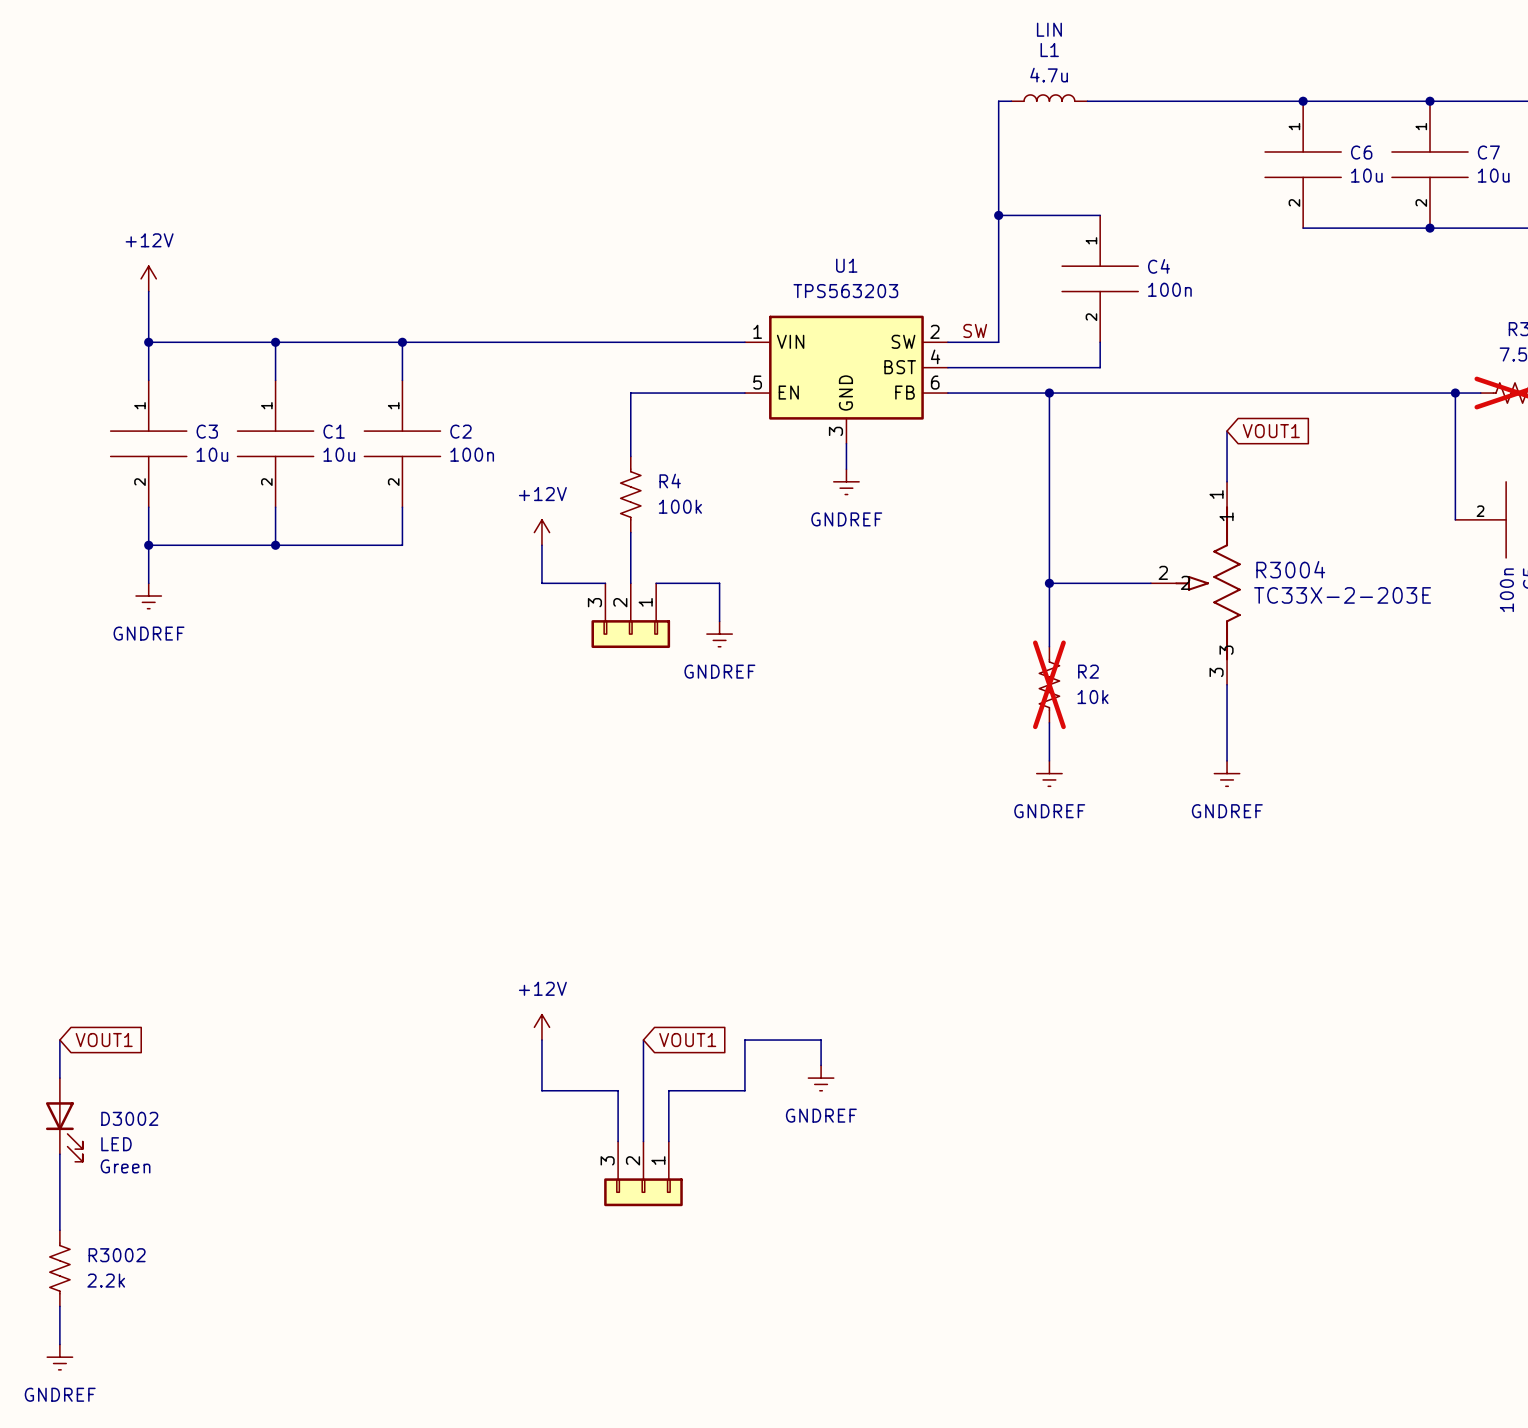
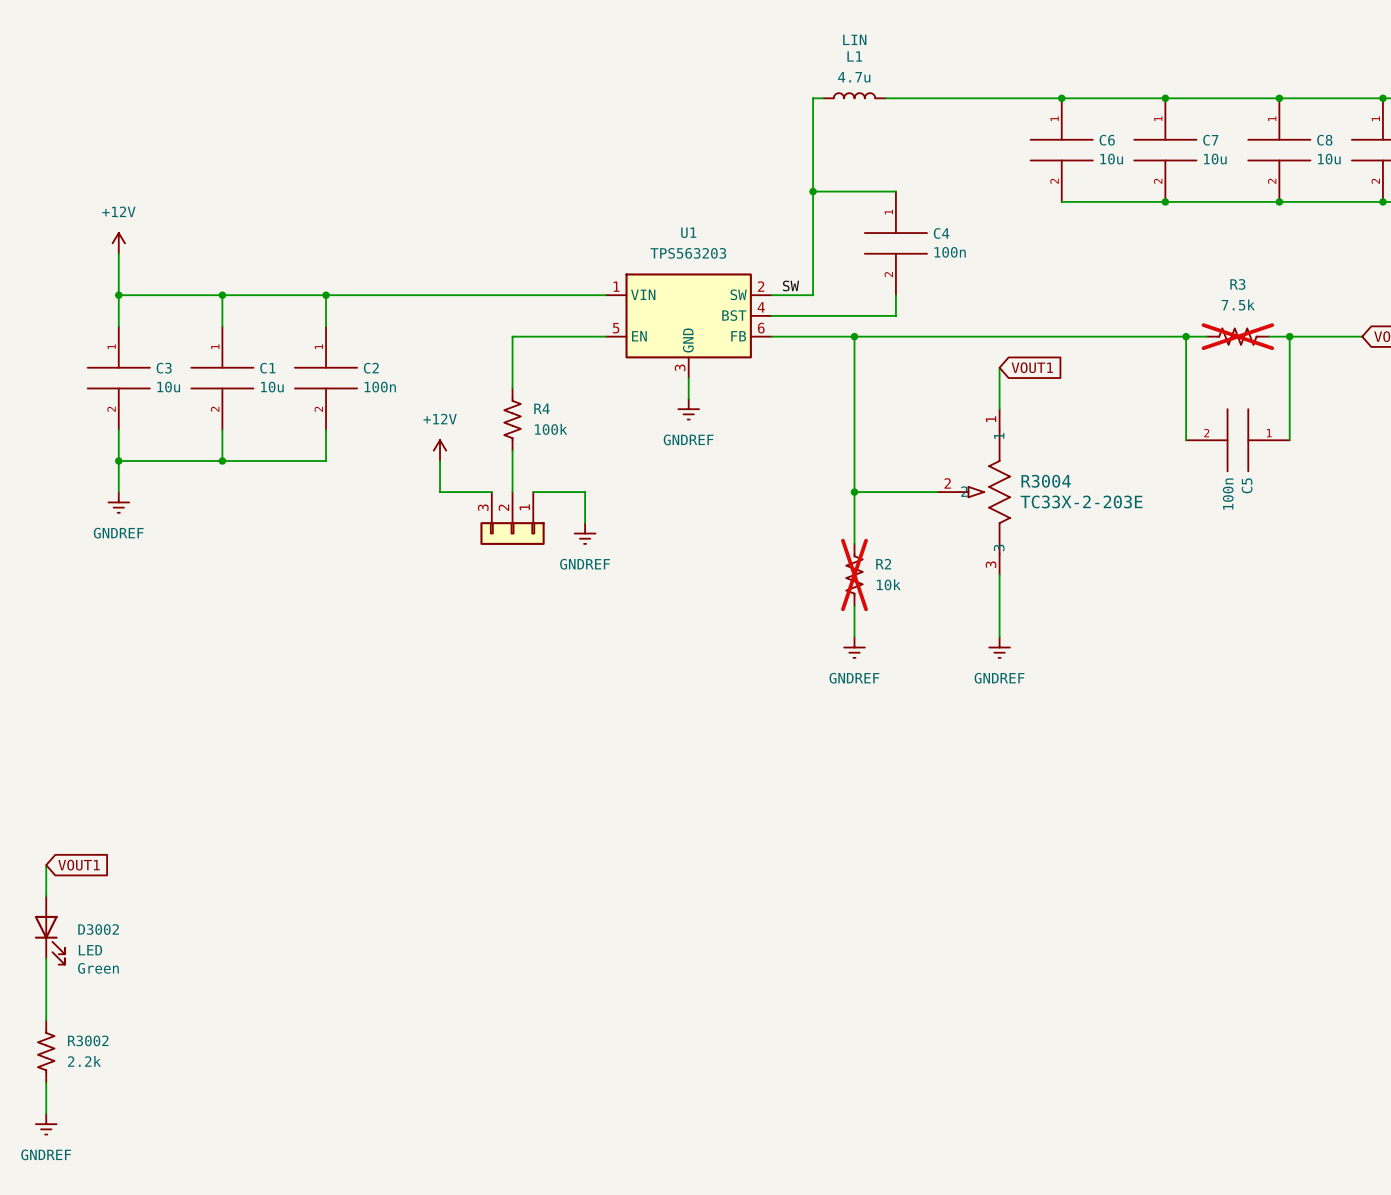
power symbol: +12V (541, 1027) -> none
wire: (541, 1040) (541, 1090) (618, 1090) (618, 1141) -> none
wire: (643, 1040) (643, 1141) -> none
global label: VOUT1 (687, 1040) -> none
wire: (821, 1065) (821, 1040) (744, 1040) (744, 1090) (668, 1090) (668, 1141) -> none
power symbol: GNDREF (821, 1078) -> none
part: (643, 1173) -> none

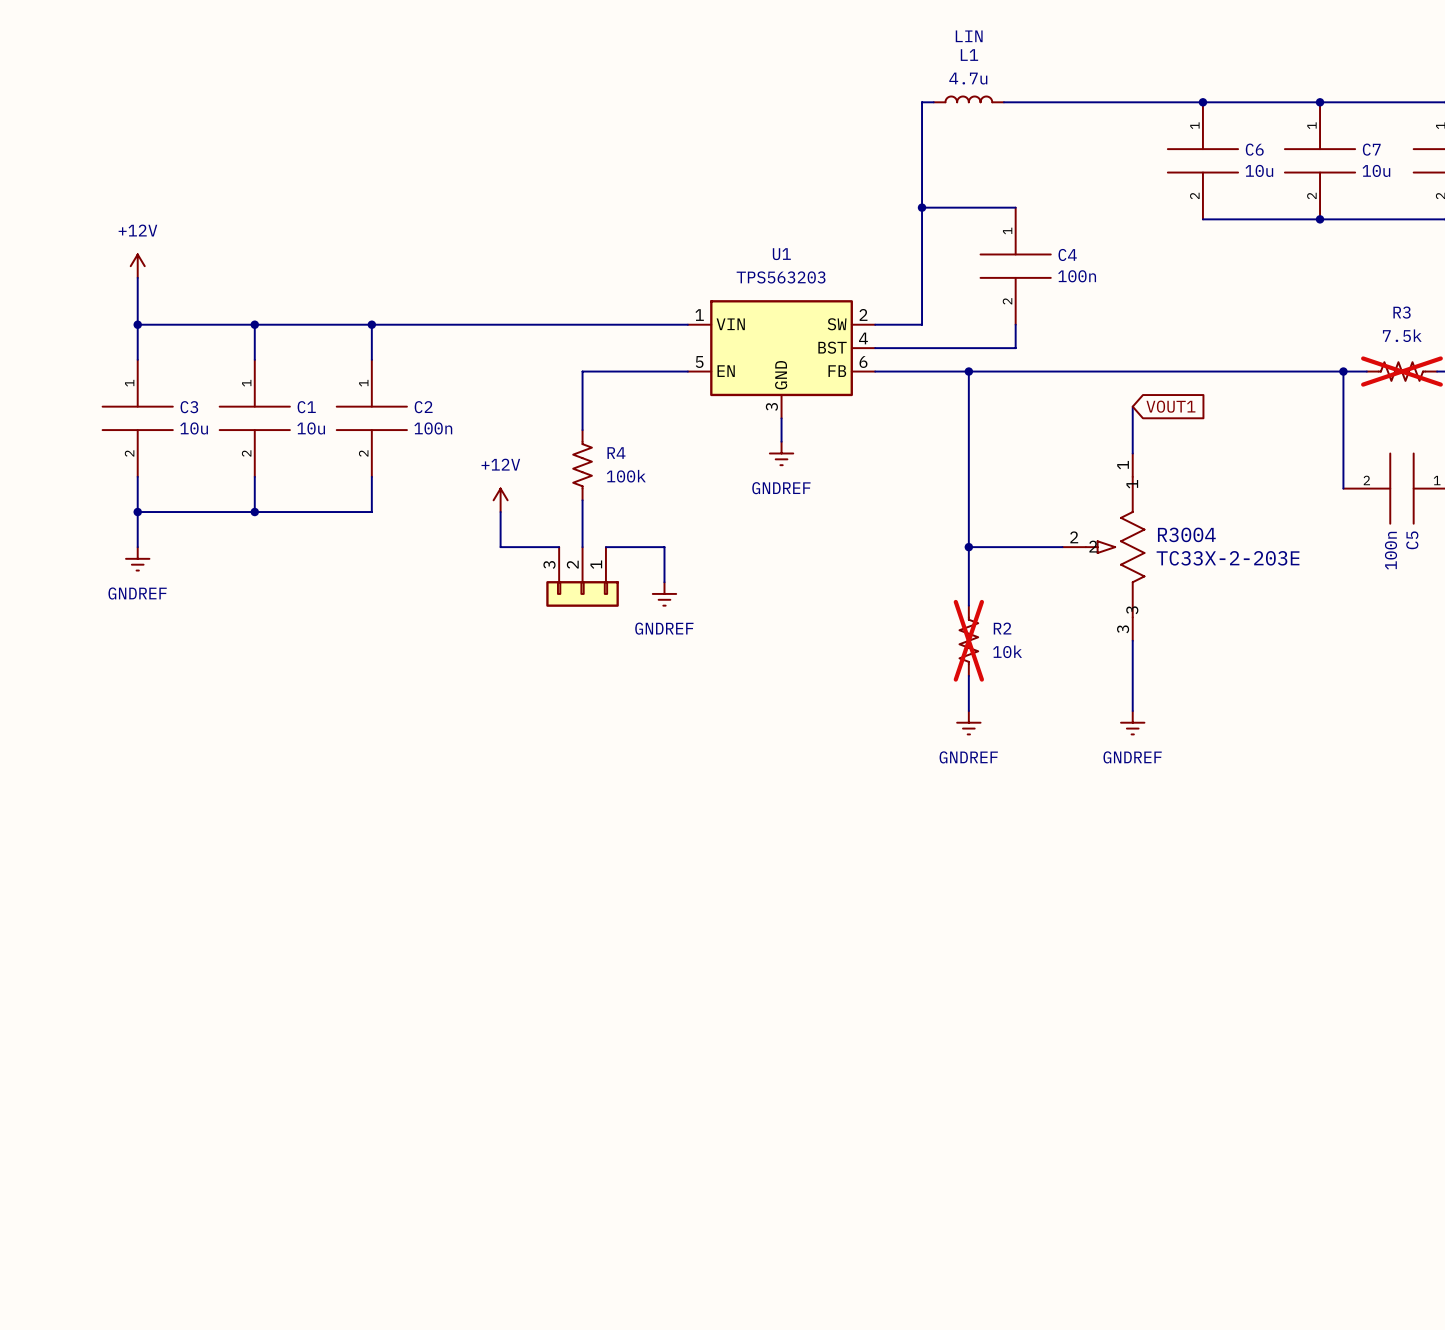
label: SW (791, 285) -> none
wire: (46, 865) (46, 896) -> none
global label: VOUT1 (79, 865) -> none
D3002: LED (49, 930) -> none
wire: (46, 958) (46, 1020) -> none
R3002: 2.2k (46, 1051) -> none
wire: (46, 1082) (46, 1113) -> none
power symbol: GNDREF (46, 1124) -> none

